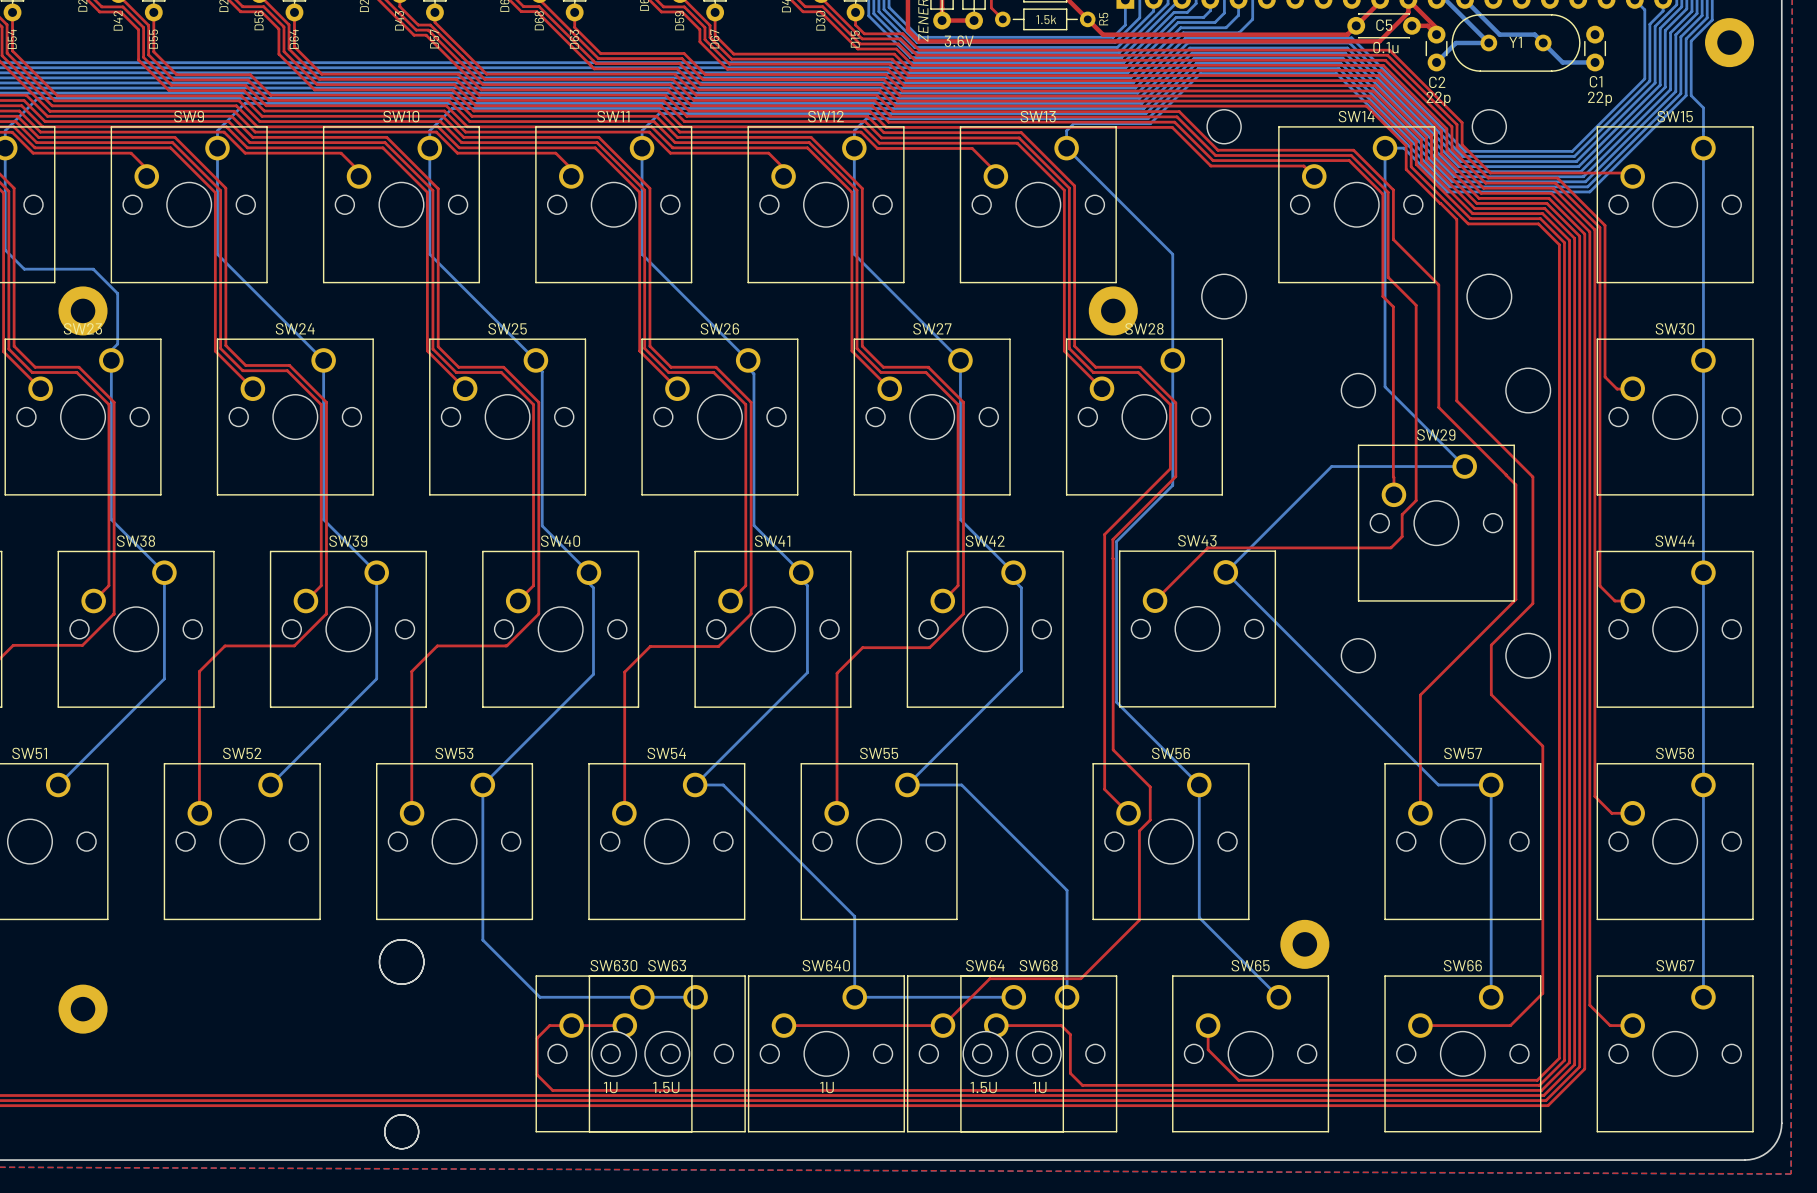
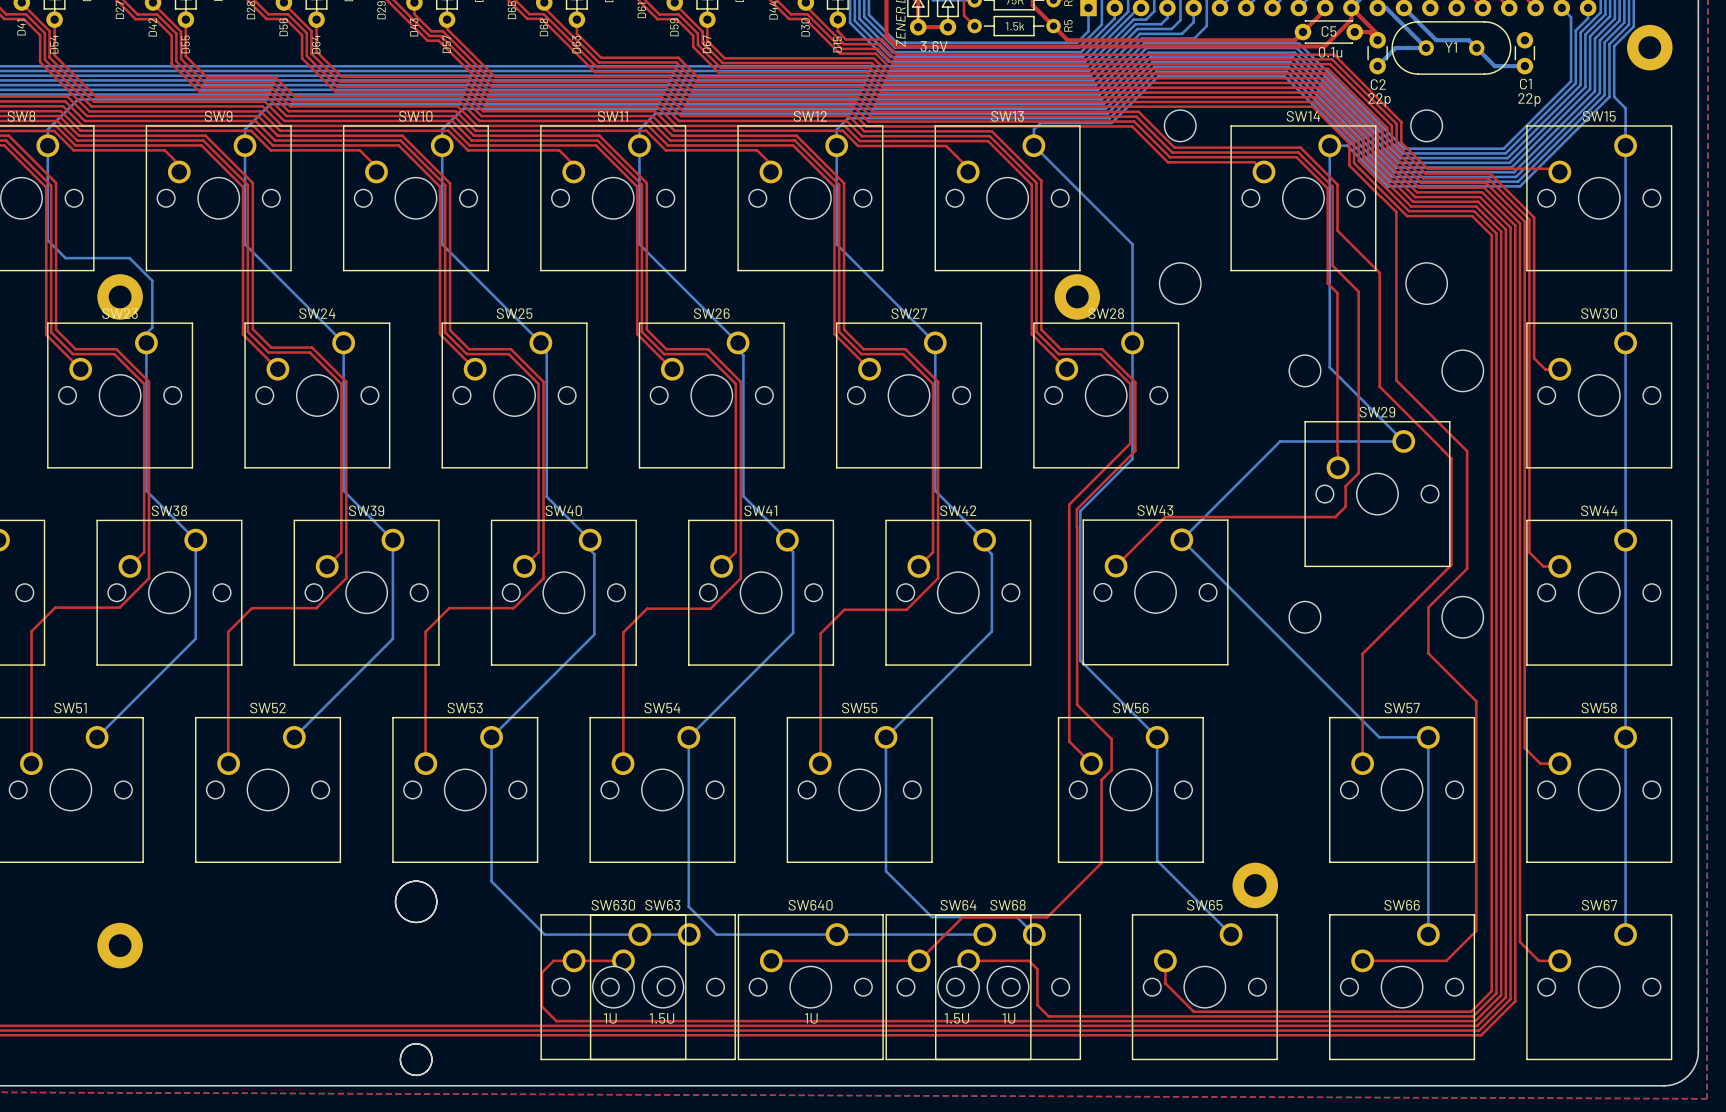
bottom track: (695, 784) (723, 784) (854, 916) (854, 997) -> (688, 737) (688, 906) (716, 934) (837, 934)
bottom track: (907, 784) (961, 784) (1067, 890) (1067, 997) -> (886, 737) (886, 871) (931, 917) (1016, 917) (1034, 934)

